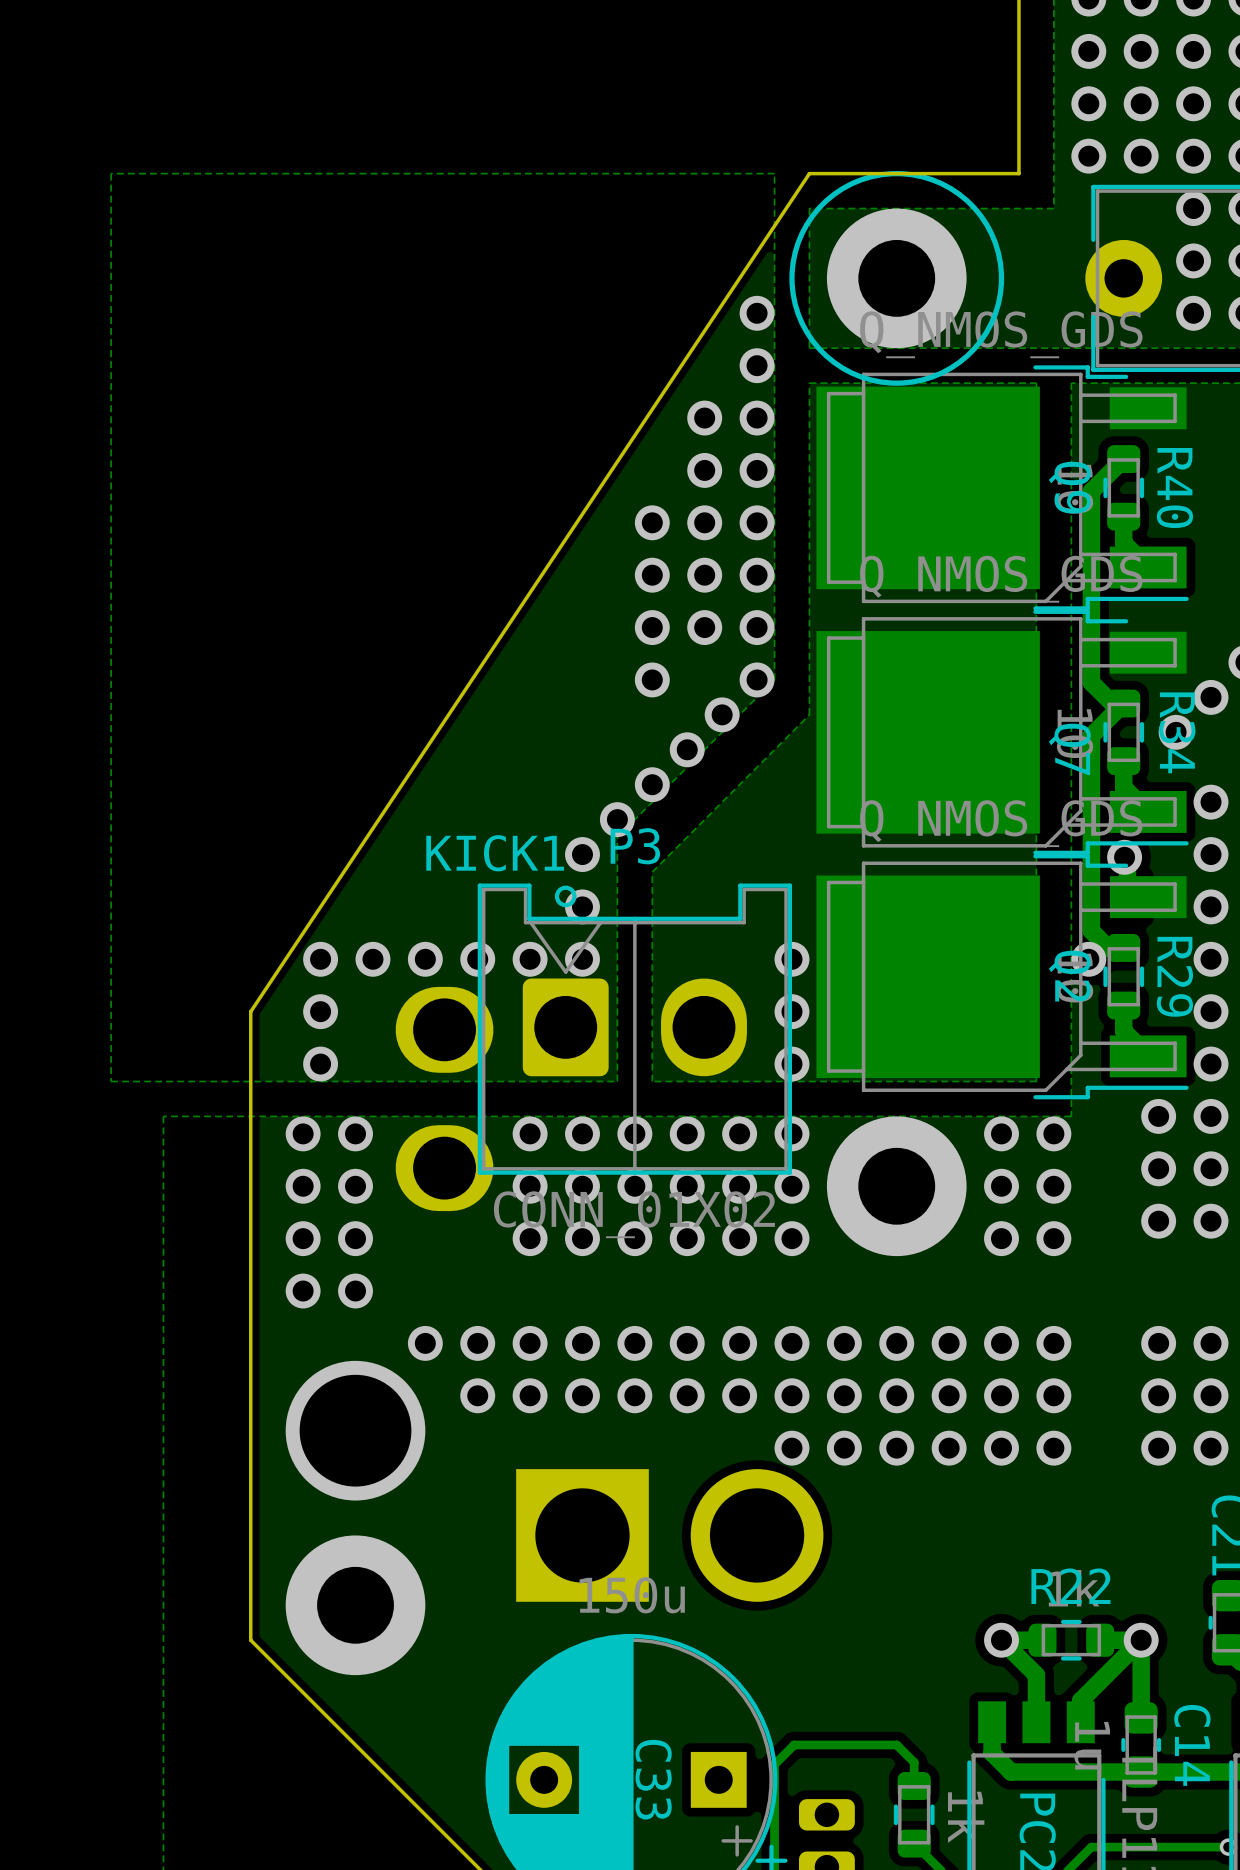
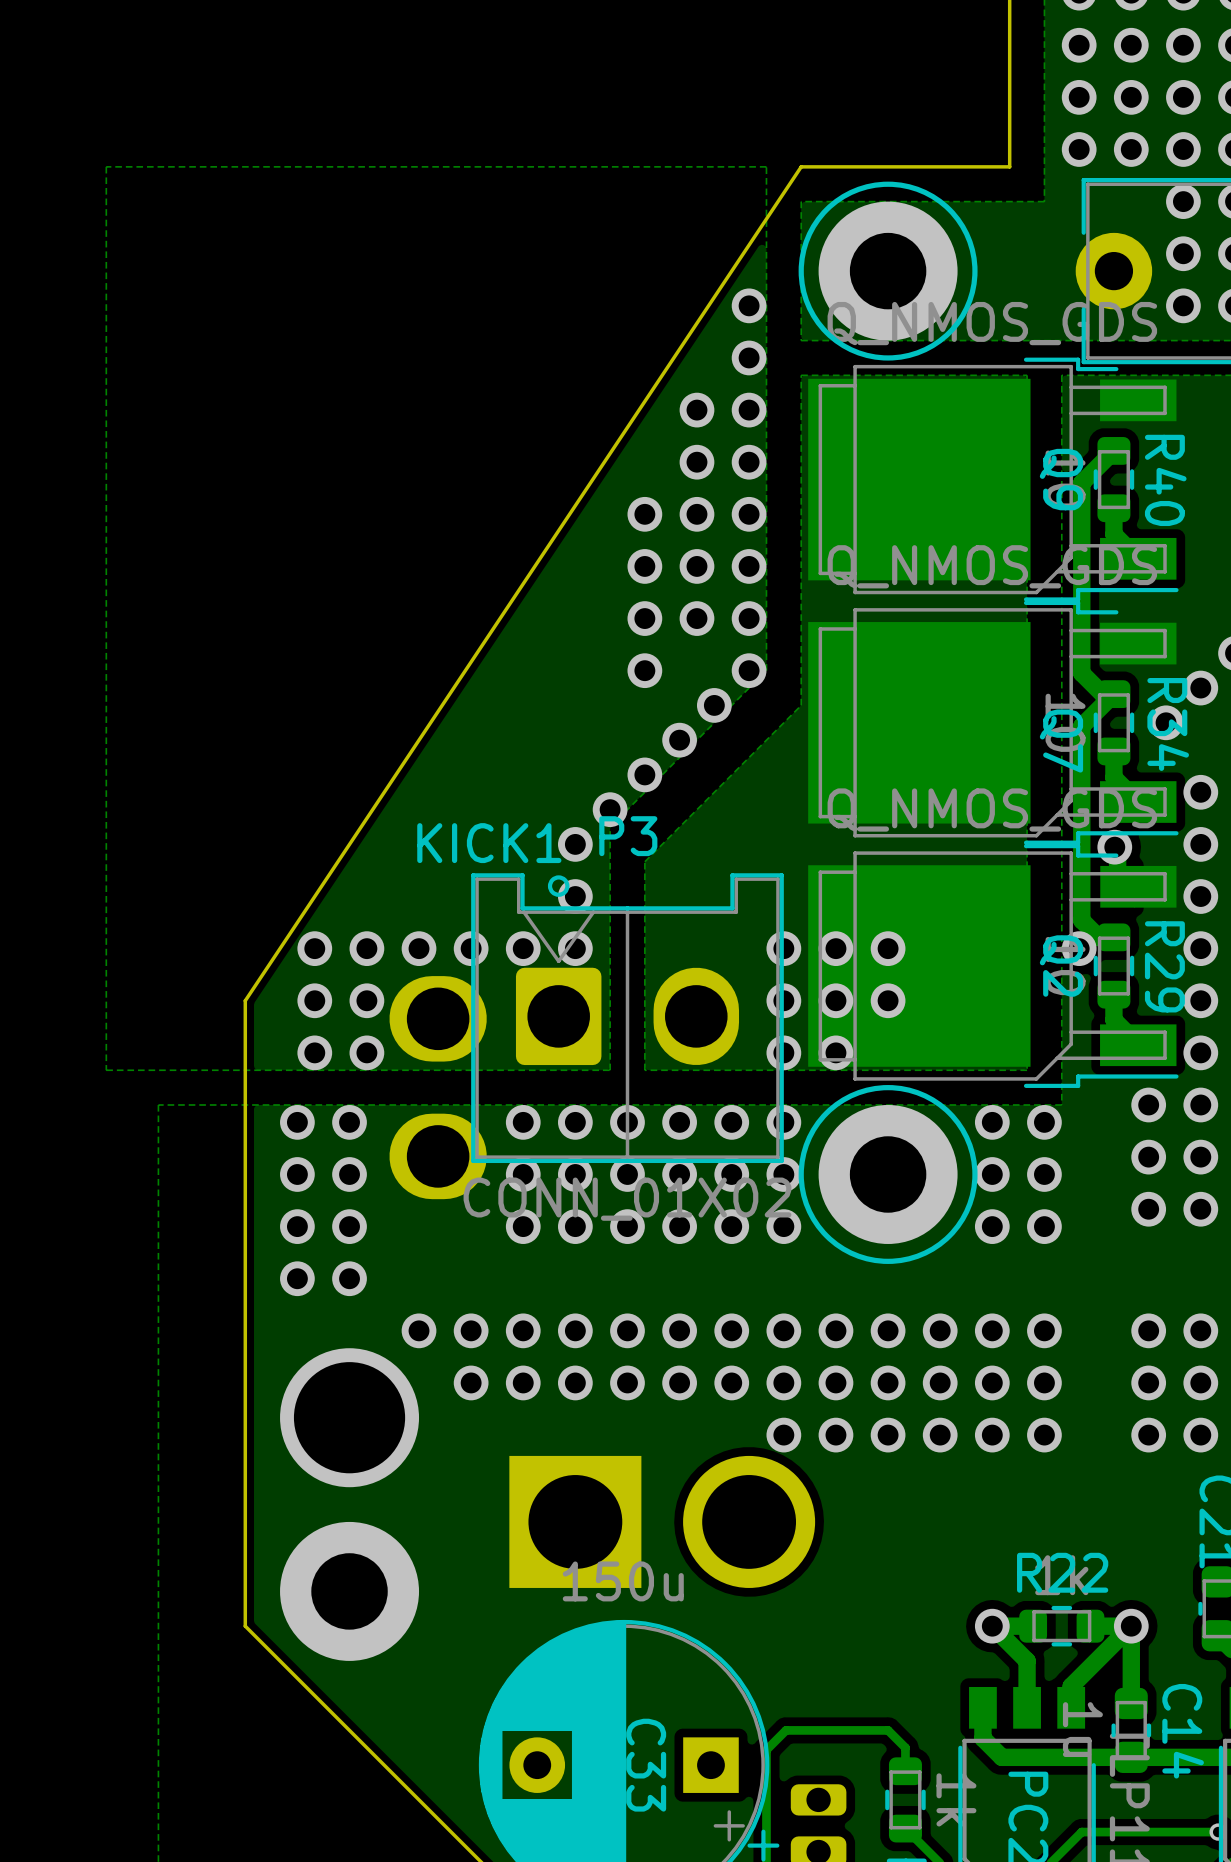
drawing shape: [789, 171, 1005, 386] -> [798, 181, 978, 361]
via: none -> (835, 948)
via: none -> (888, 948)
via: none -> (366, 1000)
via: none -> (835, 1000)
via: none -> (888, 1000)
via: none -> (366, 1052)
via: none -> (835, 1052)
drawing: none -> [798, 1085, 978, 1264]

